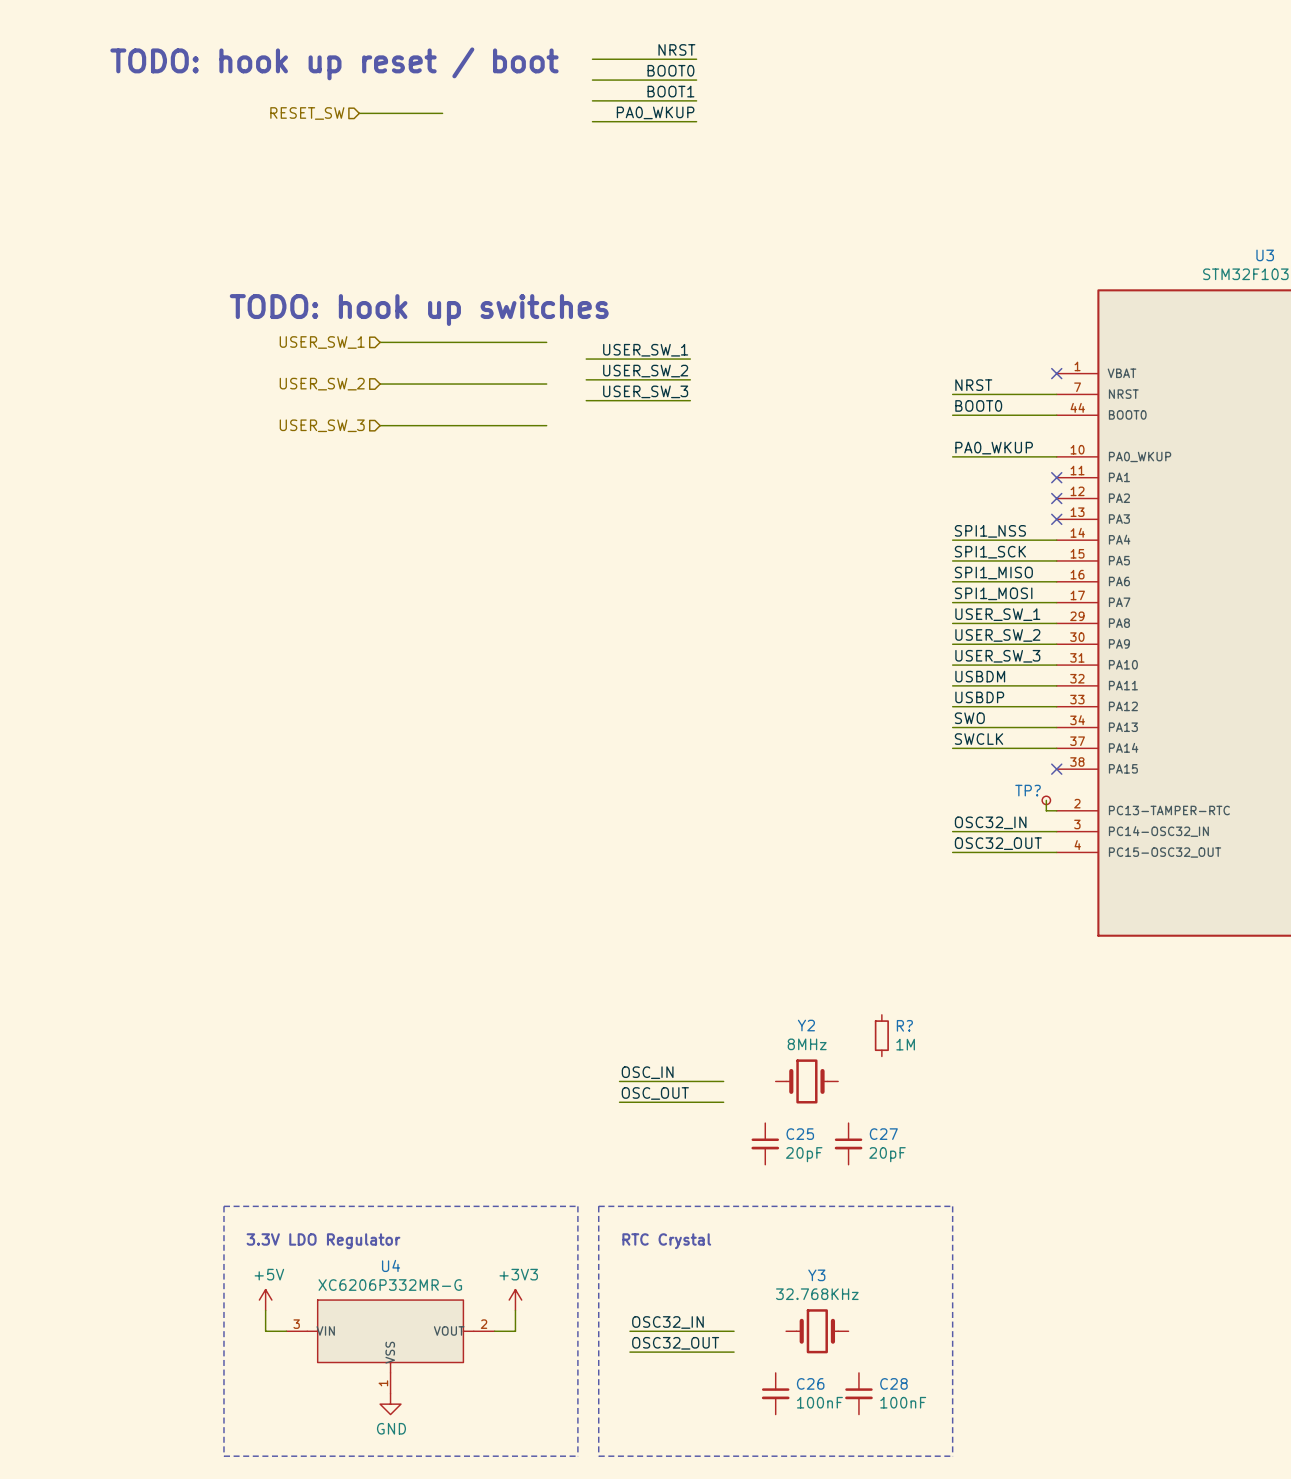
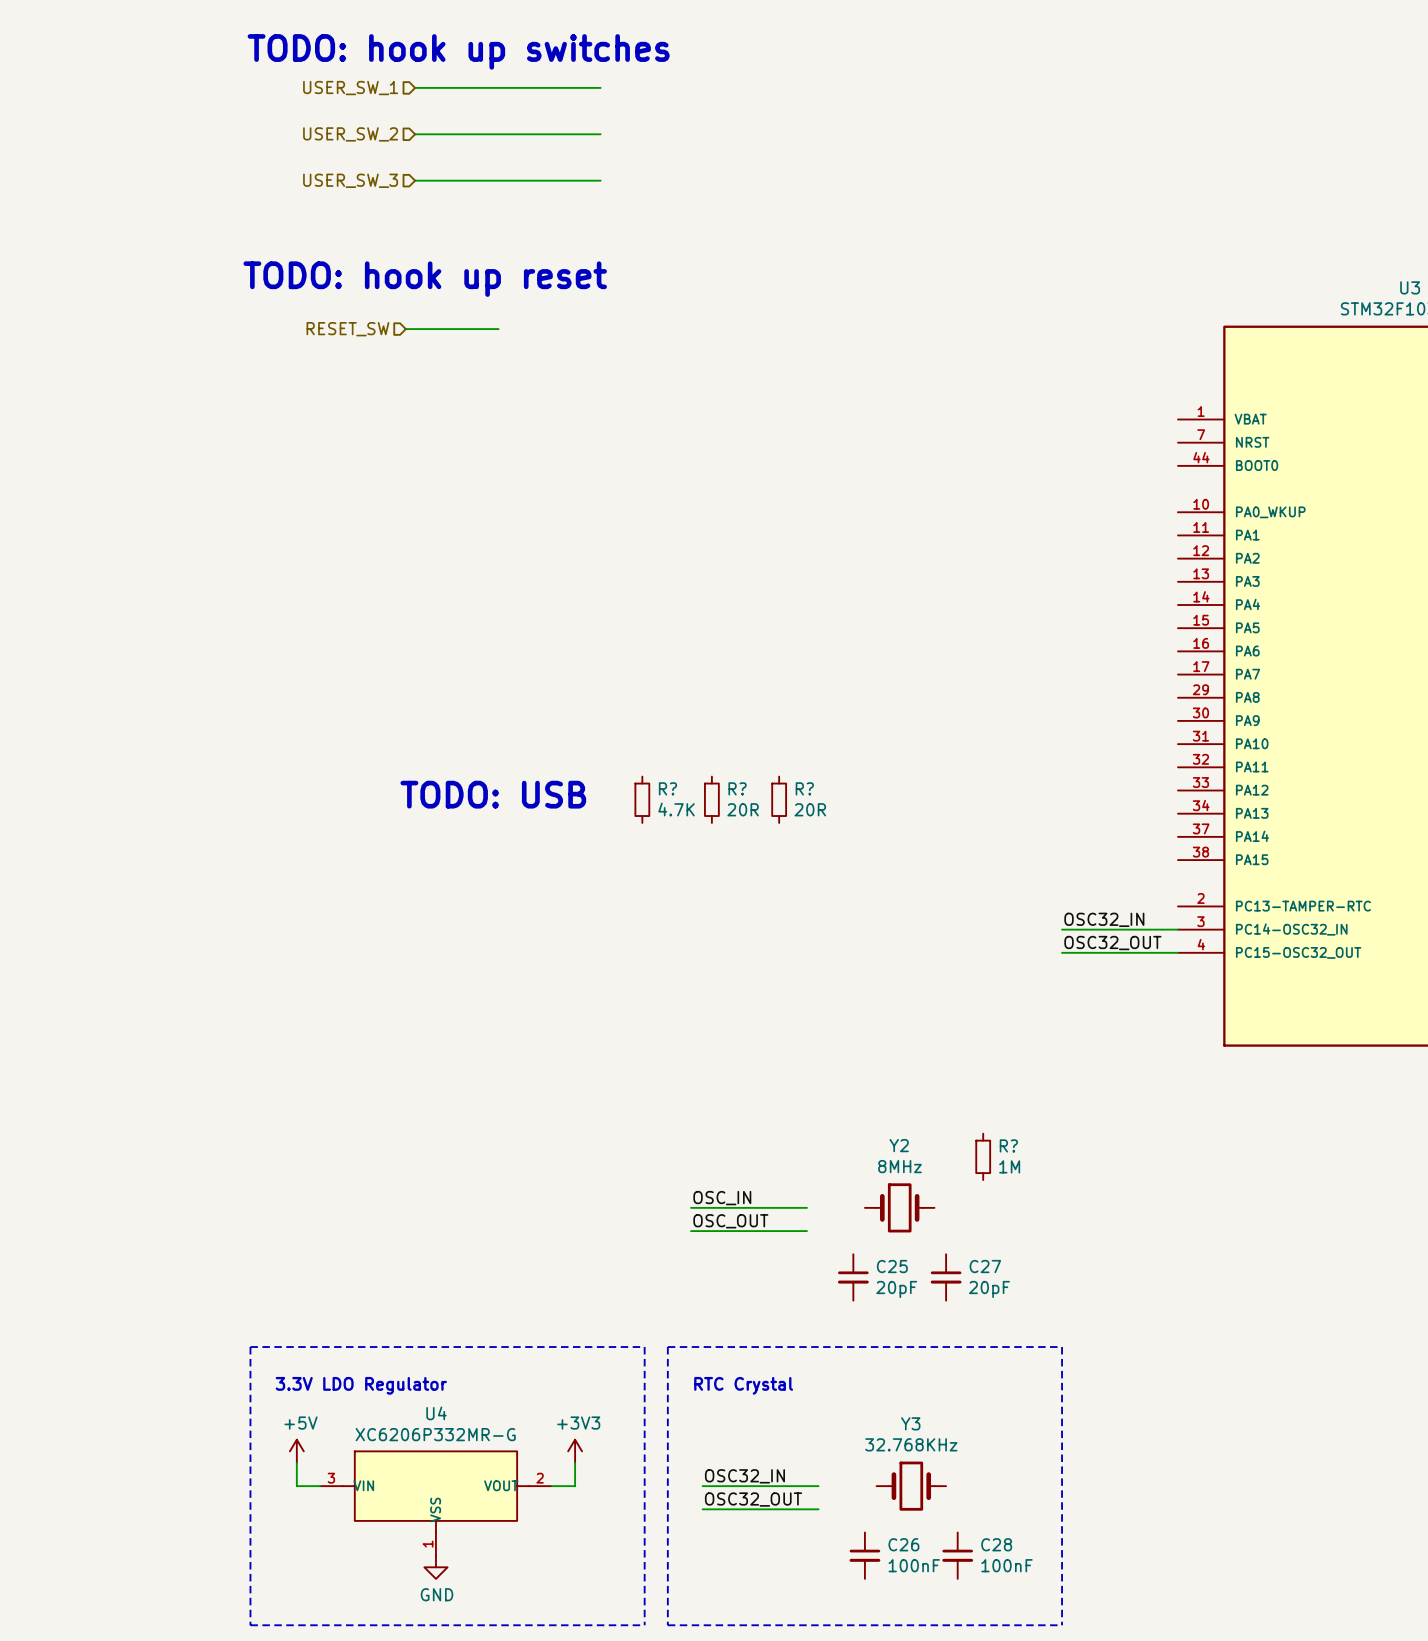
label: NRST (676, 49) -> none
wire: (592, 59) (696, 59) -> none
text: TODO: hook up reset / boot (334, 63) -> TODO: hook up switches (458, 51)
label: BOOT0 (670, 70) -> none
wire: none -> (415, 87) (600, 87)
hierarchical label: none -> USER_SW_1 (350, 88)
wire: (592, 80) (696, 80) -> none
label: BOOT1 (670, 91) -> none
wire: (592, 100) (696, 100) -> none
label: PA0_WKUP (655, 112) -> none
hierarchical label position: RESET_SW (307, 113) -> RESET_SW (347, 329)
wire: (359, 113) (442, 113) -> (405, 329) (498, 329)
hierarchical label: none -> USER_SW_2 (350, 134)
wire: none -> (415, 134) (600, 134)
wire: (592, 121) (696, 121) -> none
hierarchical label: none -> USER_SW_3 (350, 180)
text: none -> TODO: hook up reset (425, 279)
text: TODO: hook up switches (419, 310) -> none
hierarchical label: USER_SW_1 (322, 342) -> none
wire: (380, 342) (546, 342) -> (415, 180) (600, 180)
label: USER_SW_1 (645, 350) -> none
wire: (586, 359) (690, 359) -> none
label: USER_SW_2 (645, 371) -> none
no-connect mark: (1056, 373) -> none
wire: (586, 379) (690, 379) -> none
hierarchical label: USER_SW_2 (322, 384) -> none
wire: (380, 384) (546, 384) -> none
label: NRST (973, 385) -> none
label: USER_SW_3 (645, 391) -> none
wire: (952, 394) (1056, 394) -> none
wire: (586, 400) (690, 400) -> none
label: BOOT0 (978, 405) -> none
wire: (952, 415) (1056, 415) -> none
hierarchical label: USER_SW_3 (322, 425) -> none
wire: (380, 425) (546, 425) -> none
label: PA0_WKUP (994, 448) -> none
wire: (952, 456) (1056, 456) -> none
no-connect mark: (1056, 477) -> none
no-connect mark: (1056, 498) -> none
no-connect mark: (1056, 519) -> none
label: SPI1_NSS (990, 531) -> none
wire: (952, 540) (1056, 540) -> none
label: SPI1_SCK (990, 552) -> none
wire: (952, 560) (1056, 560) -> none
label: SPI1_MISO (993, 573) -> none
wire: (952, 581) (1056, 581) -> none
label: SPI1_MOSI (993, 593) -> none
wire: (952, 602) (1056, 602) -> none
label: USER_SW_1 (997, 614) -> none
wire: (952, 623) (1056, 623) -> none
label: USER_SW_2 (997, 635) -> none
wire: (952, 644) (1056, 644) -> none
label: USER_SW_3 (997, 656) -> none
wire: (952, 665) (1056, 665) -> none
label: USBDM (980, 676) -> none
wire: (952, 685) (1056, 685) -> none
label: USBDP (979, 697) -> none
wire: (952, 706) (1056, 706) -> none
text: none -> TODO: USB (493, 794)
R?: none -> 4.7K (642, 799)
R?: none -> 20R (711, 799)
R?: none -> 20R (779, 799)
label: SWO (969, 718) -> none
wire: (952, 727) (1056, 727) -> none
label: SWCLK (979, 739) -> none
wire: (952, 748) (1056, 748) -> none
no-connect mark: (1056, 769) -> none
wire: (1046, 800) (1046, 810) (1056, 810) -> none
TP?: (1046, 800) -> none

